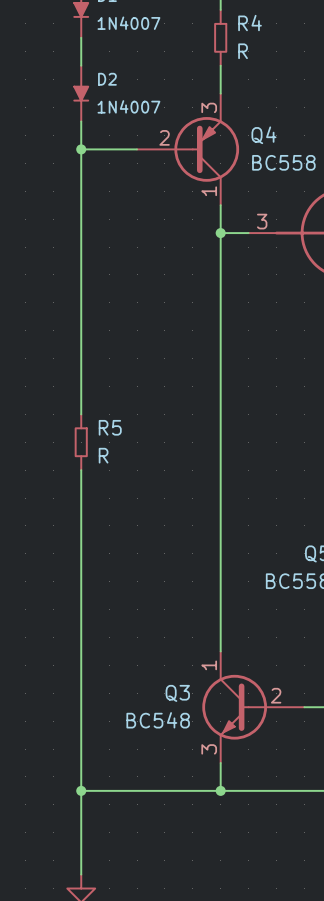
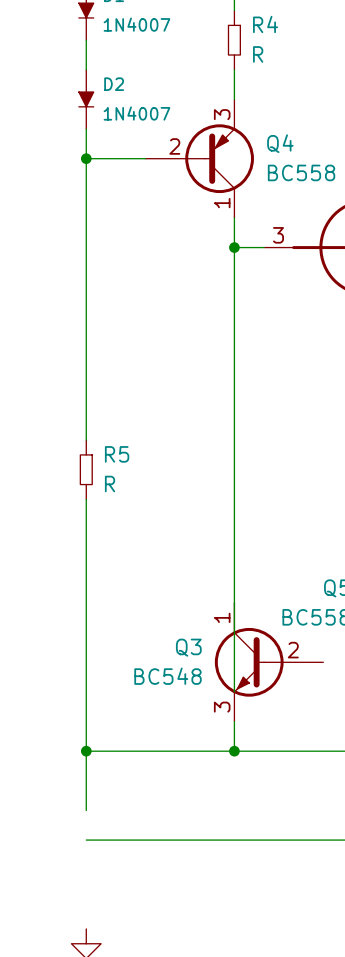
wire: none -> (86, 751) (323, 751)
junction: none -> (86, 751)
junction: none -> (234, 751)
Q3 position: (253, 707) -> (269, 662)
wire: (81, 763) (81, 874) -> none
wire: (220, 763) (220, 790) -> (234, 721) (234, 751)
junction: (81, 790) -> none
junction: (220, 790) -> none

